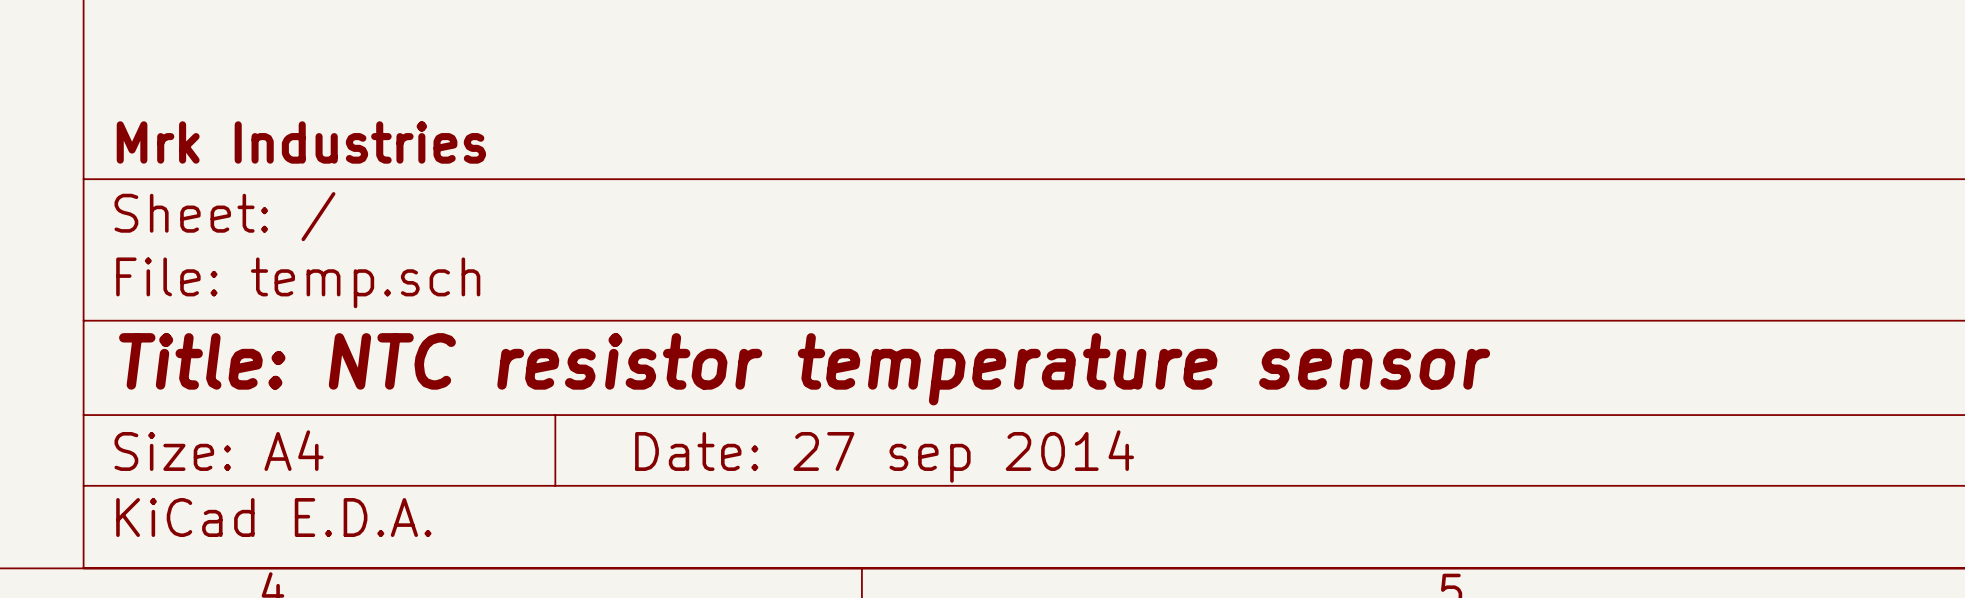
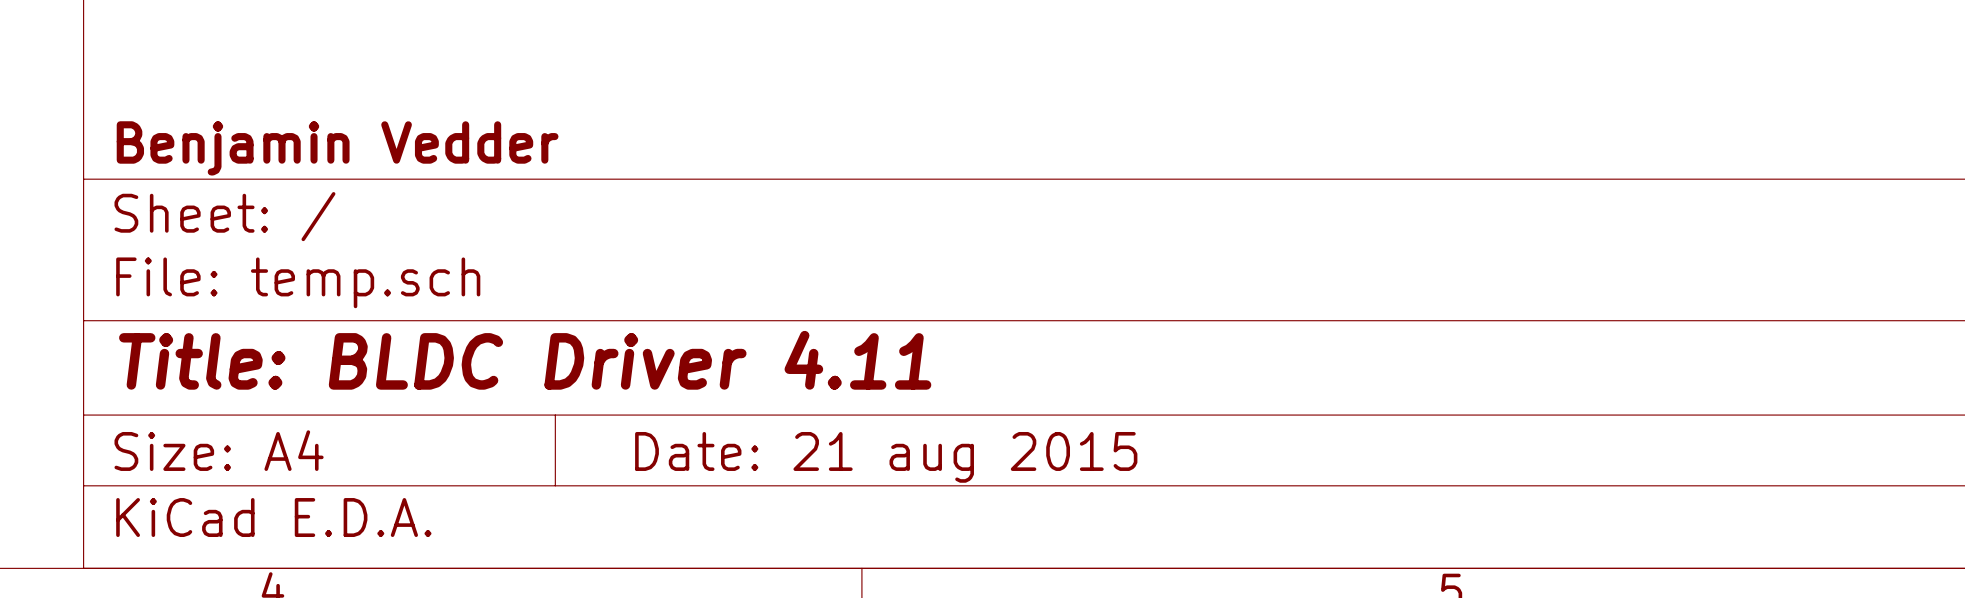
title block: Mrk Industries (301, 142) -> Benjamin Vedder (337, 148)
title block: Title: NTC resistor temperature sensor (804, 369) -> Title: BLDC Driver 4.11 (525, 360)
title block: Date: 27 sep 2014 (884, 456) -> Date: 21 aug 2015 (886, 457)

